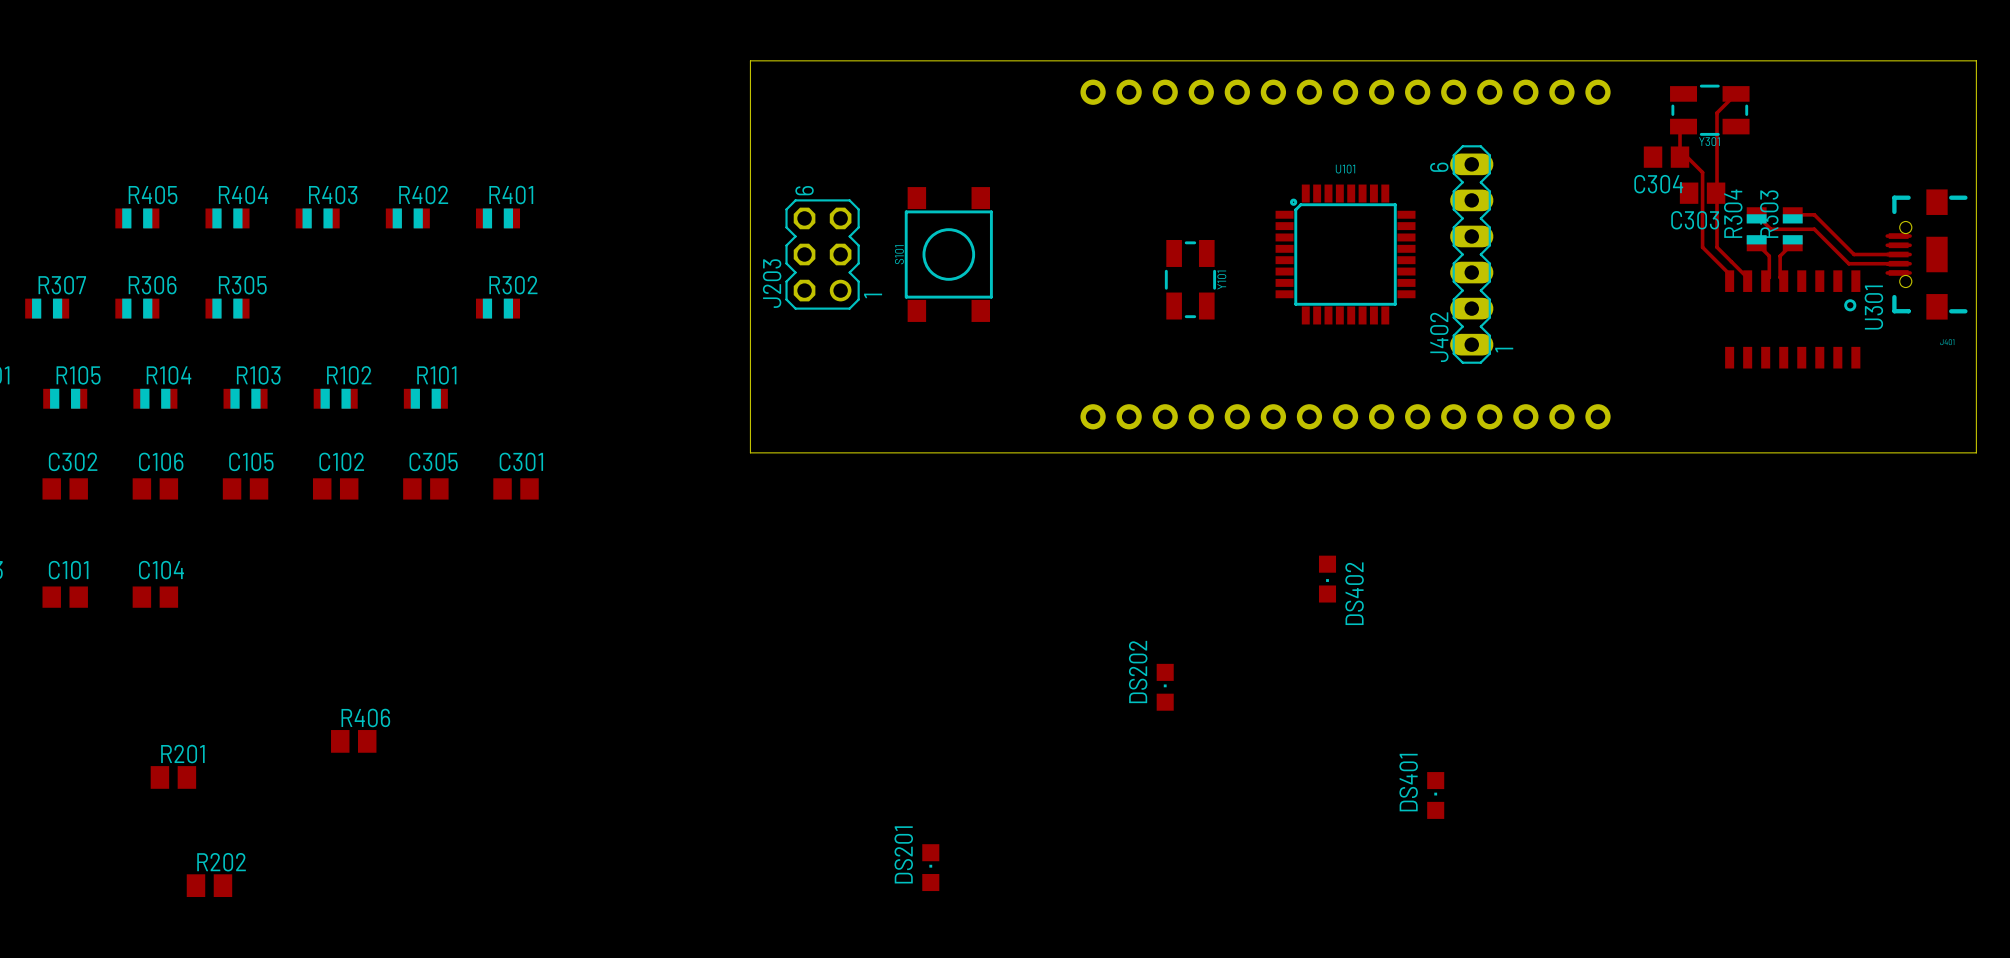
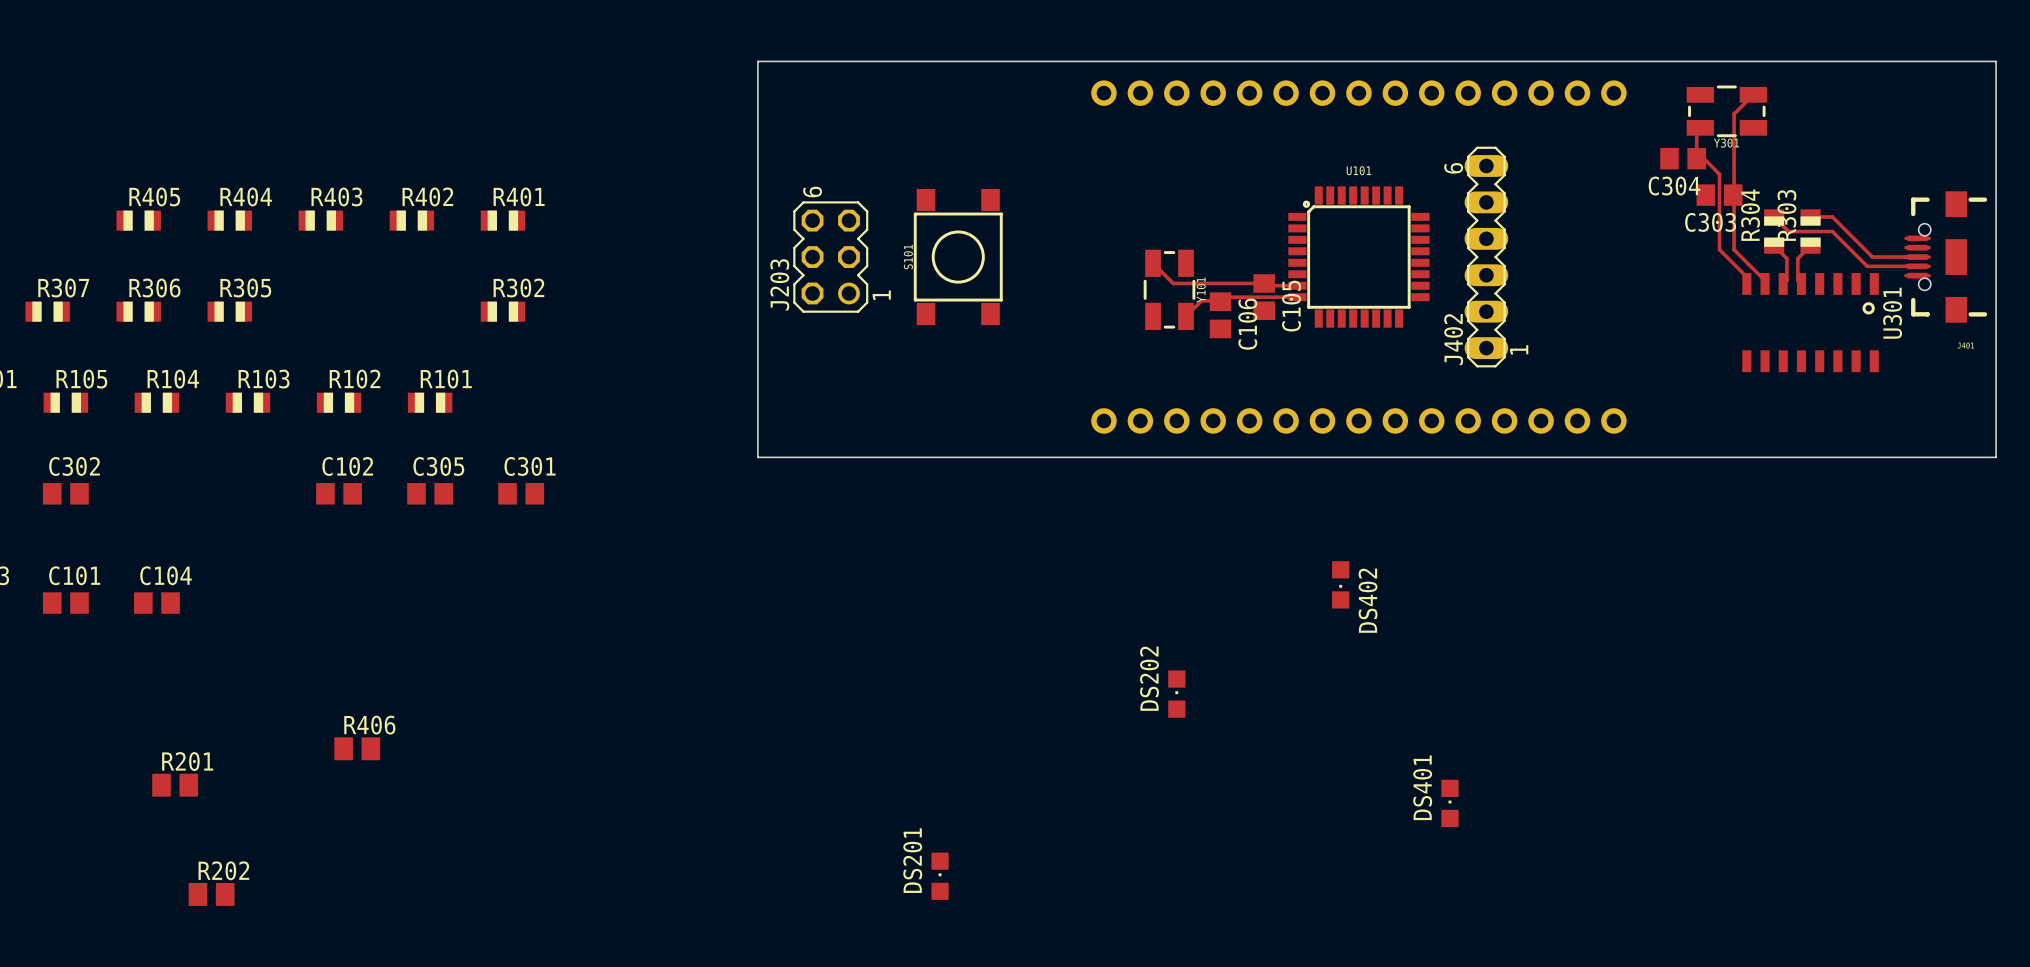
top track: none -> (1153, 263) (1173, 283) (1264, 283) (1266, 285) (1297, 285)
Y101 position: (1190, 279) -> (1169, 289)
top track: none -> (1297, 297) (1225, 297) (1220, 301) (1201, 300) (1186, 316)
C106 rotation: 0° (155, 488) -> 90° clockwise (1220, 315)
C106 position: (155, 488) -> (1220, 315)
C105 rotation: 0° (245, 488) -> 90° clockwise (1264, 297)
C105 position: (245, 488) -> (1264, 297)

